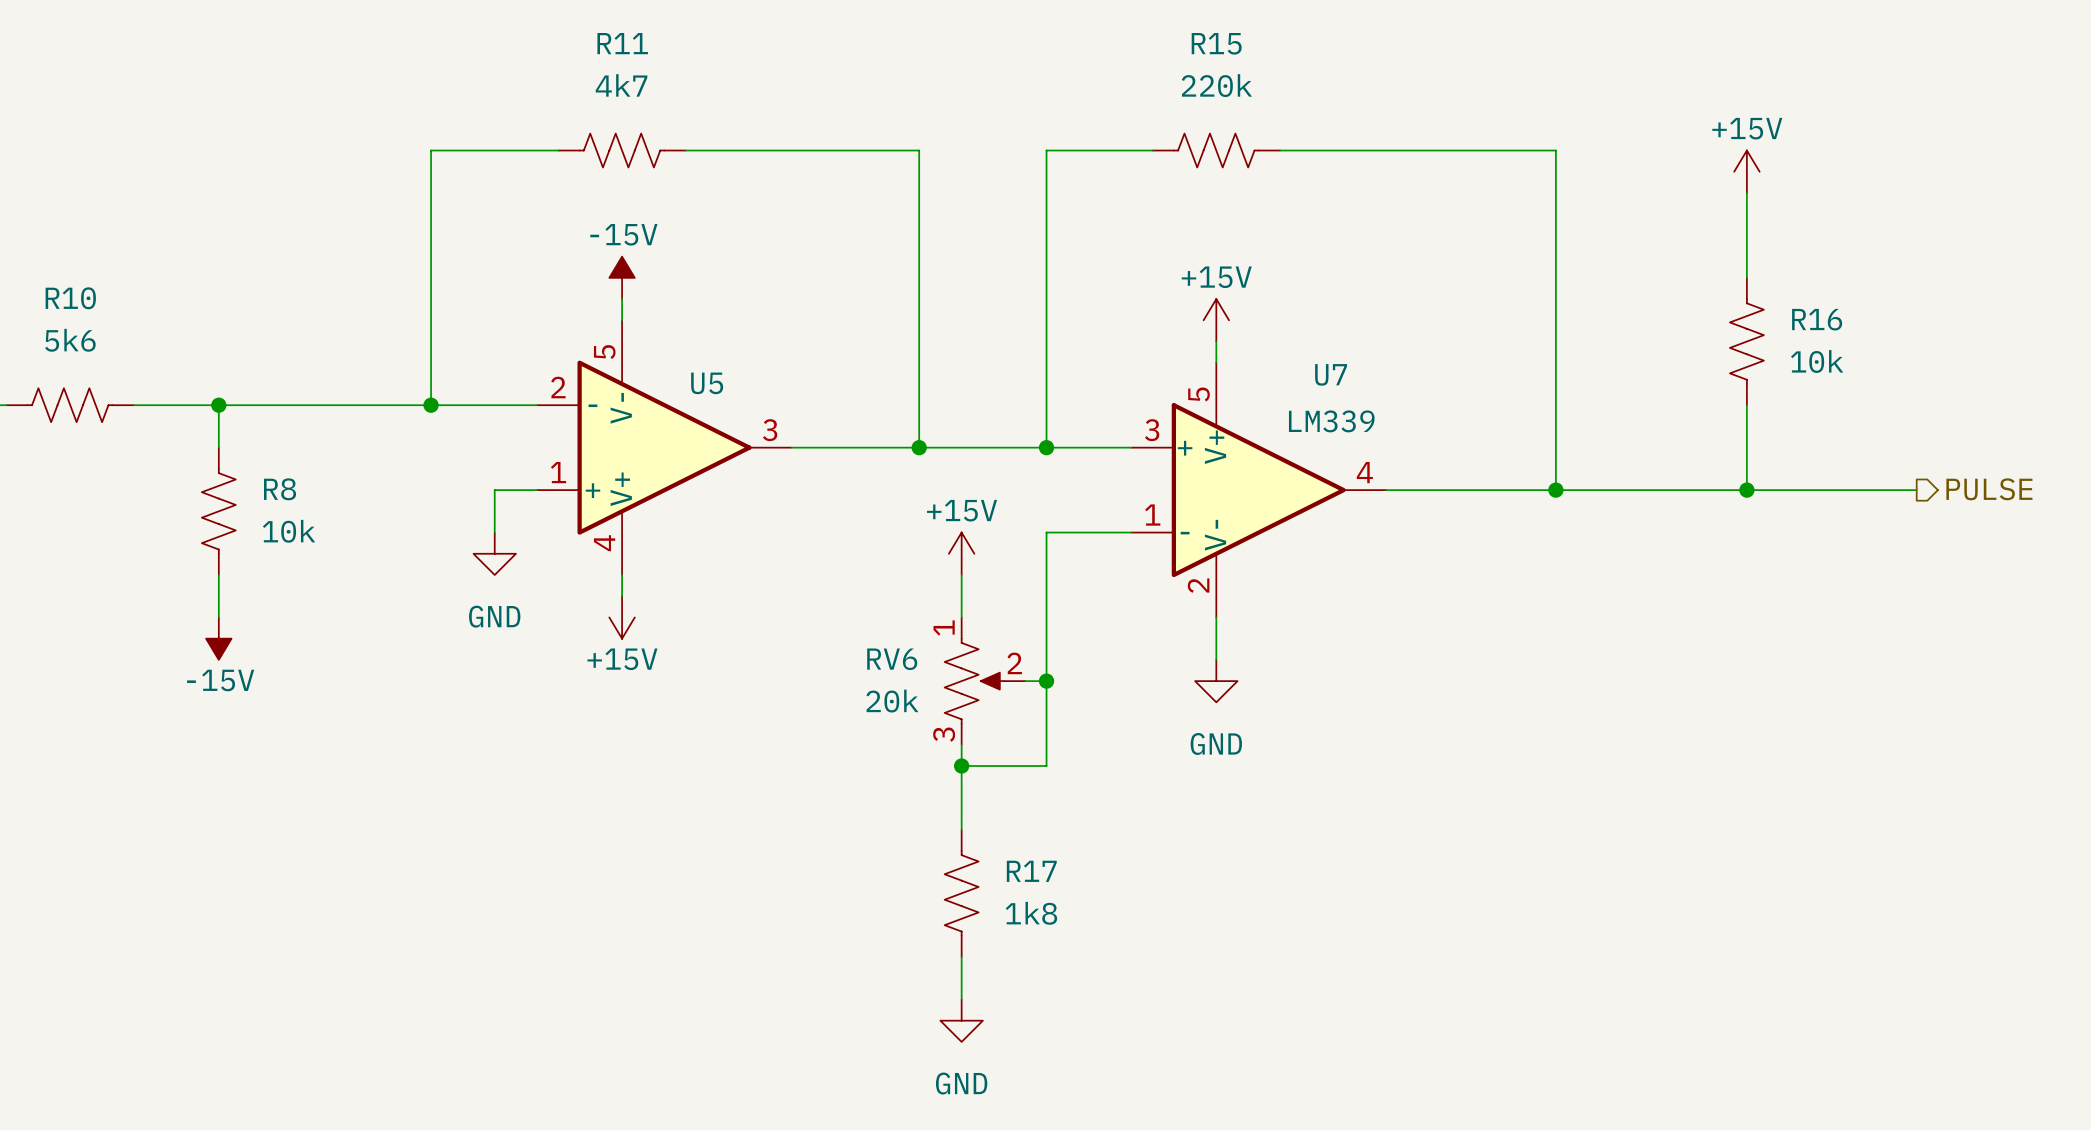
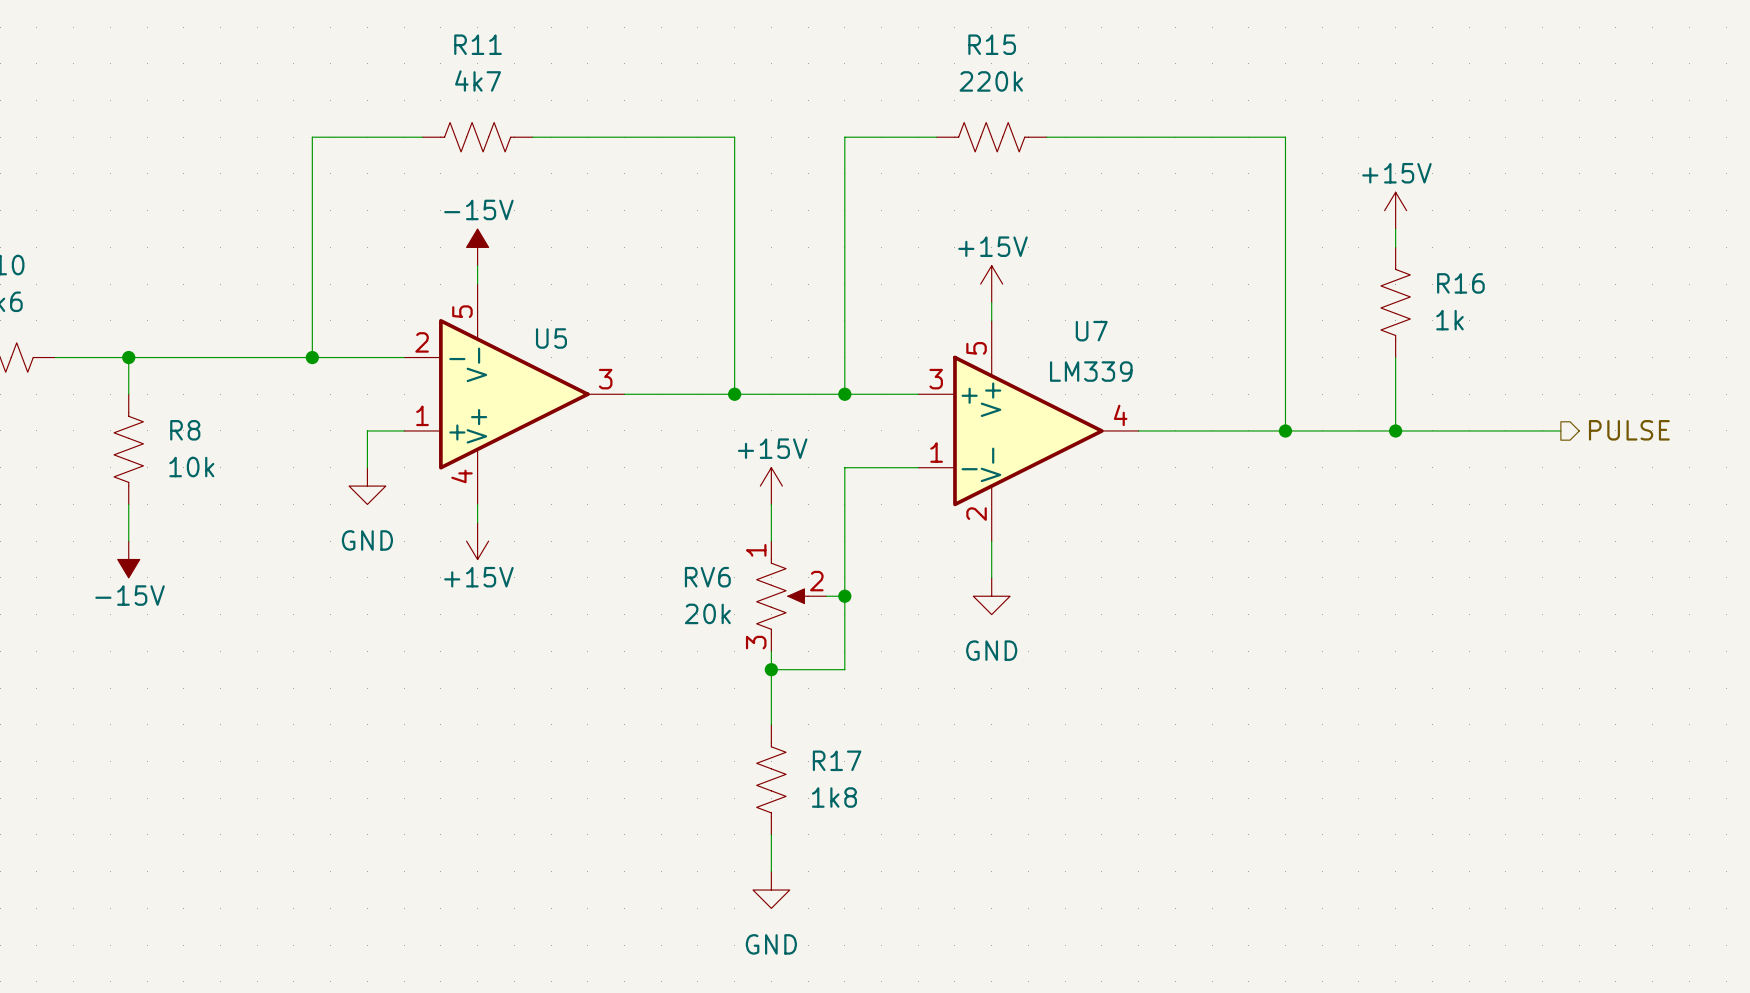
power symbol position: +15V (1746, 171) -> +15V (1395, 210)
wire: (1746, 192) (1746, 277) -> none
wire: none -> (1395, 229) (1395, 247)
R16 position: (1746, 341) -> (1395, 302)
R16 value: 10k (1817, 361) -> 1k (1449, 320)
wire: (1746, 405) (1746, 490) -> (1395, 357) (1395, 430)
hierarchical label position: PULSE (1989, 489) -> PULSE (1629, 430)
junction position: (1746, 490) -> (1395, 430)
wire: (1874, 490) (1916, 490) -> none

